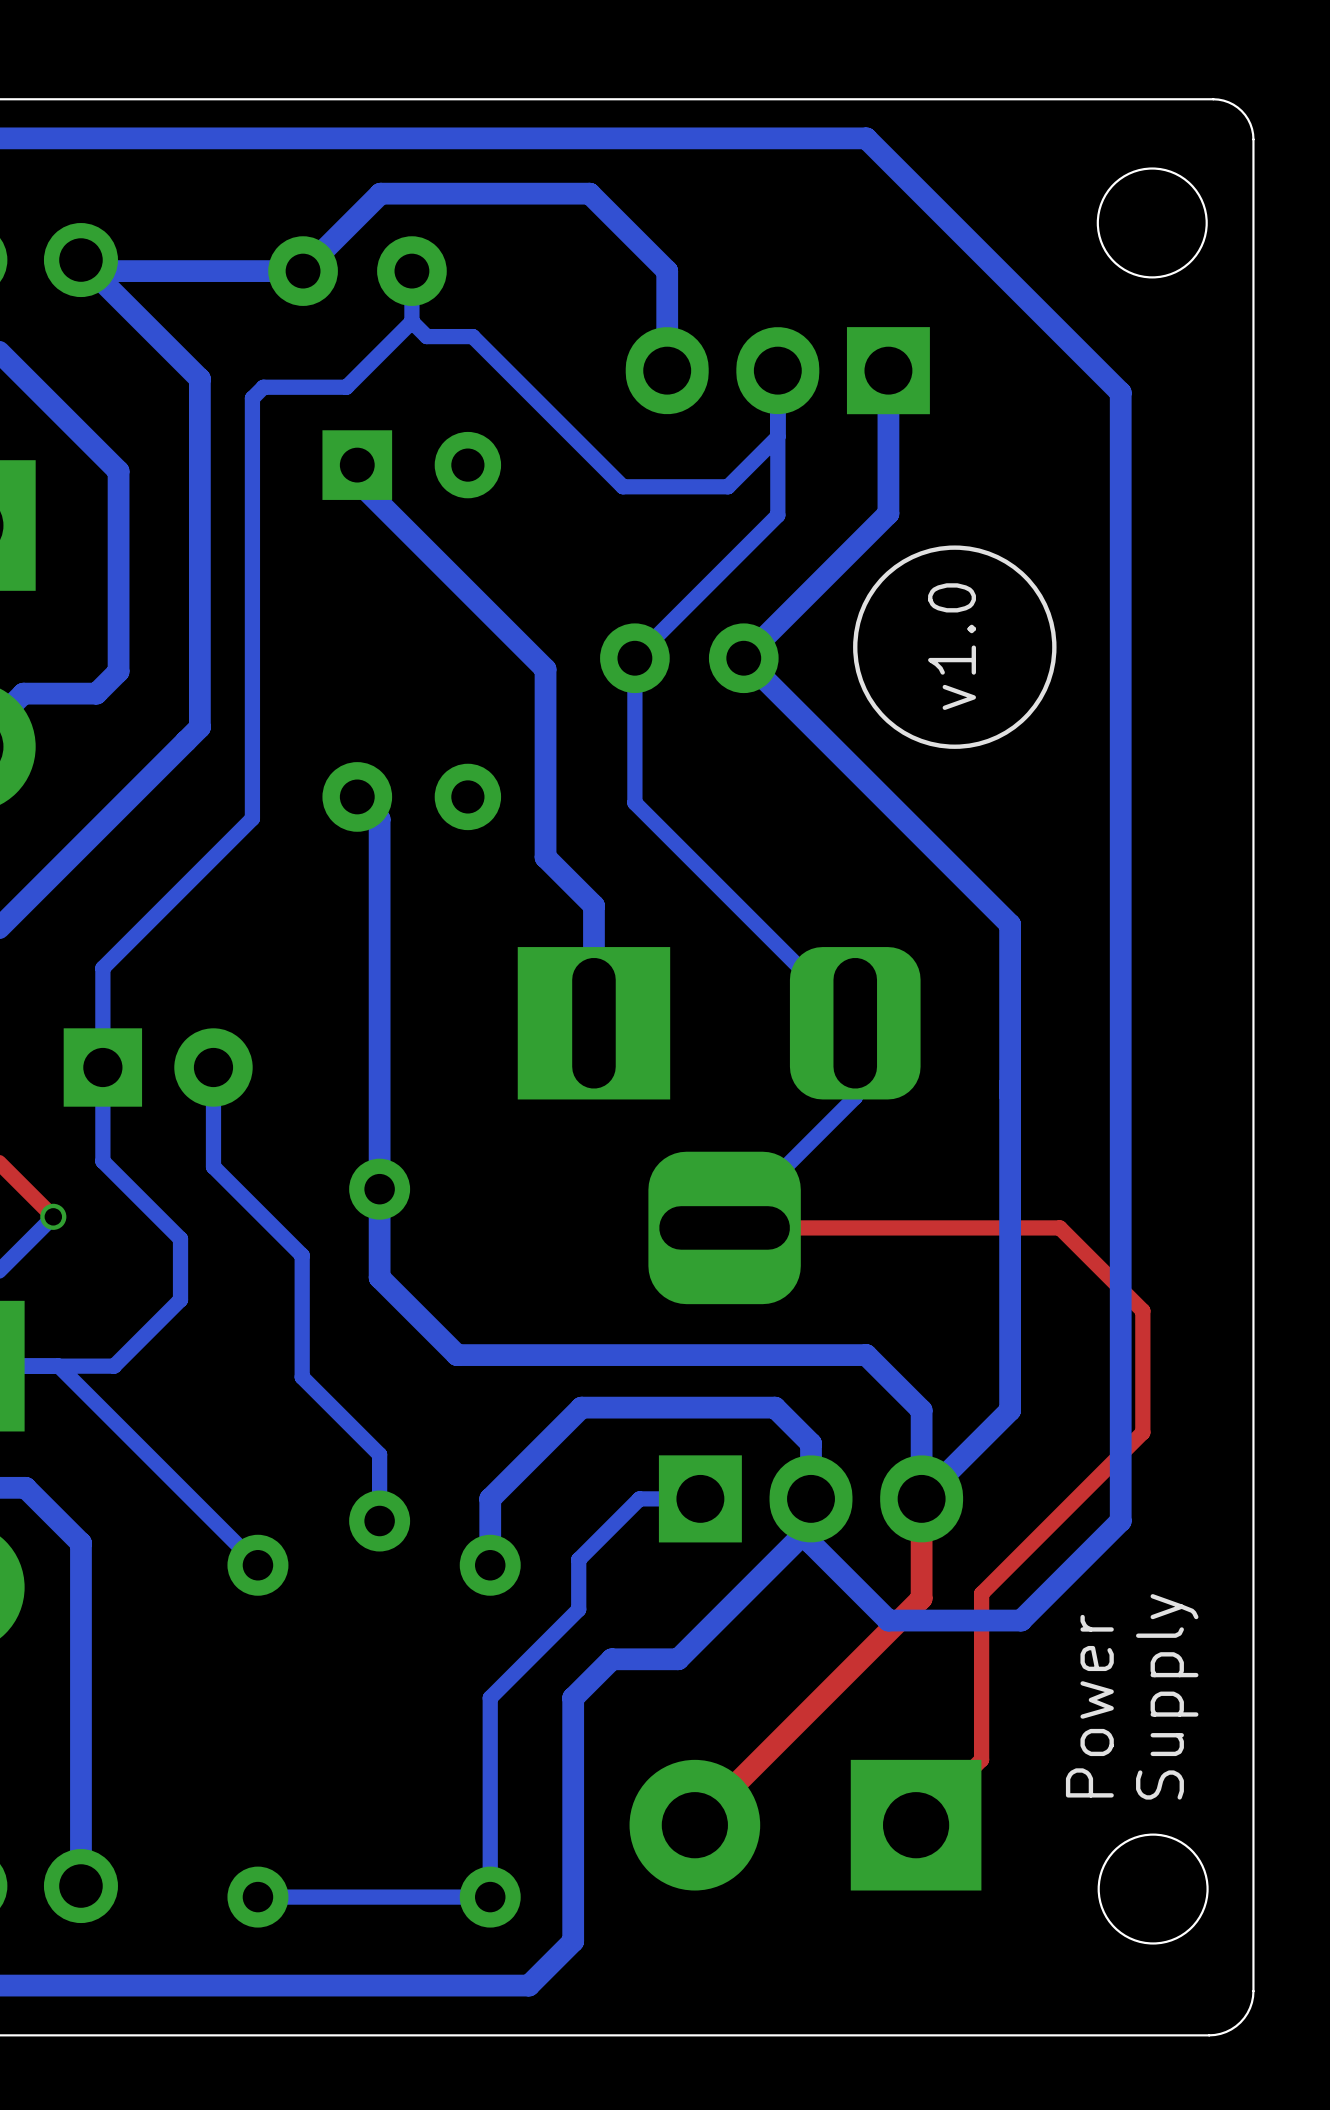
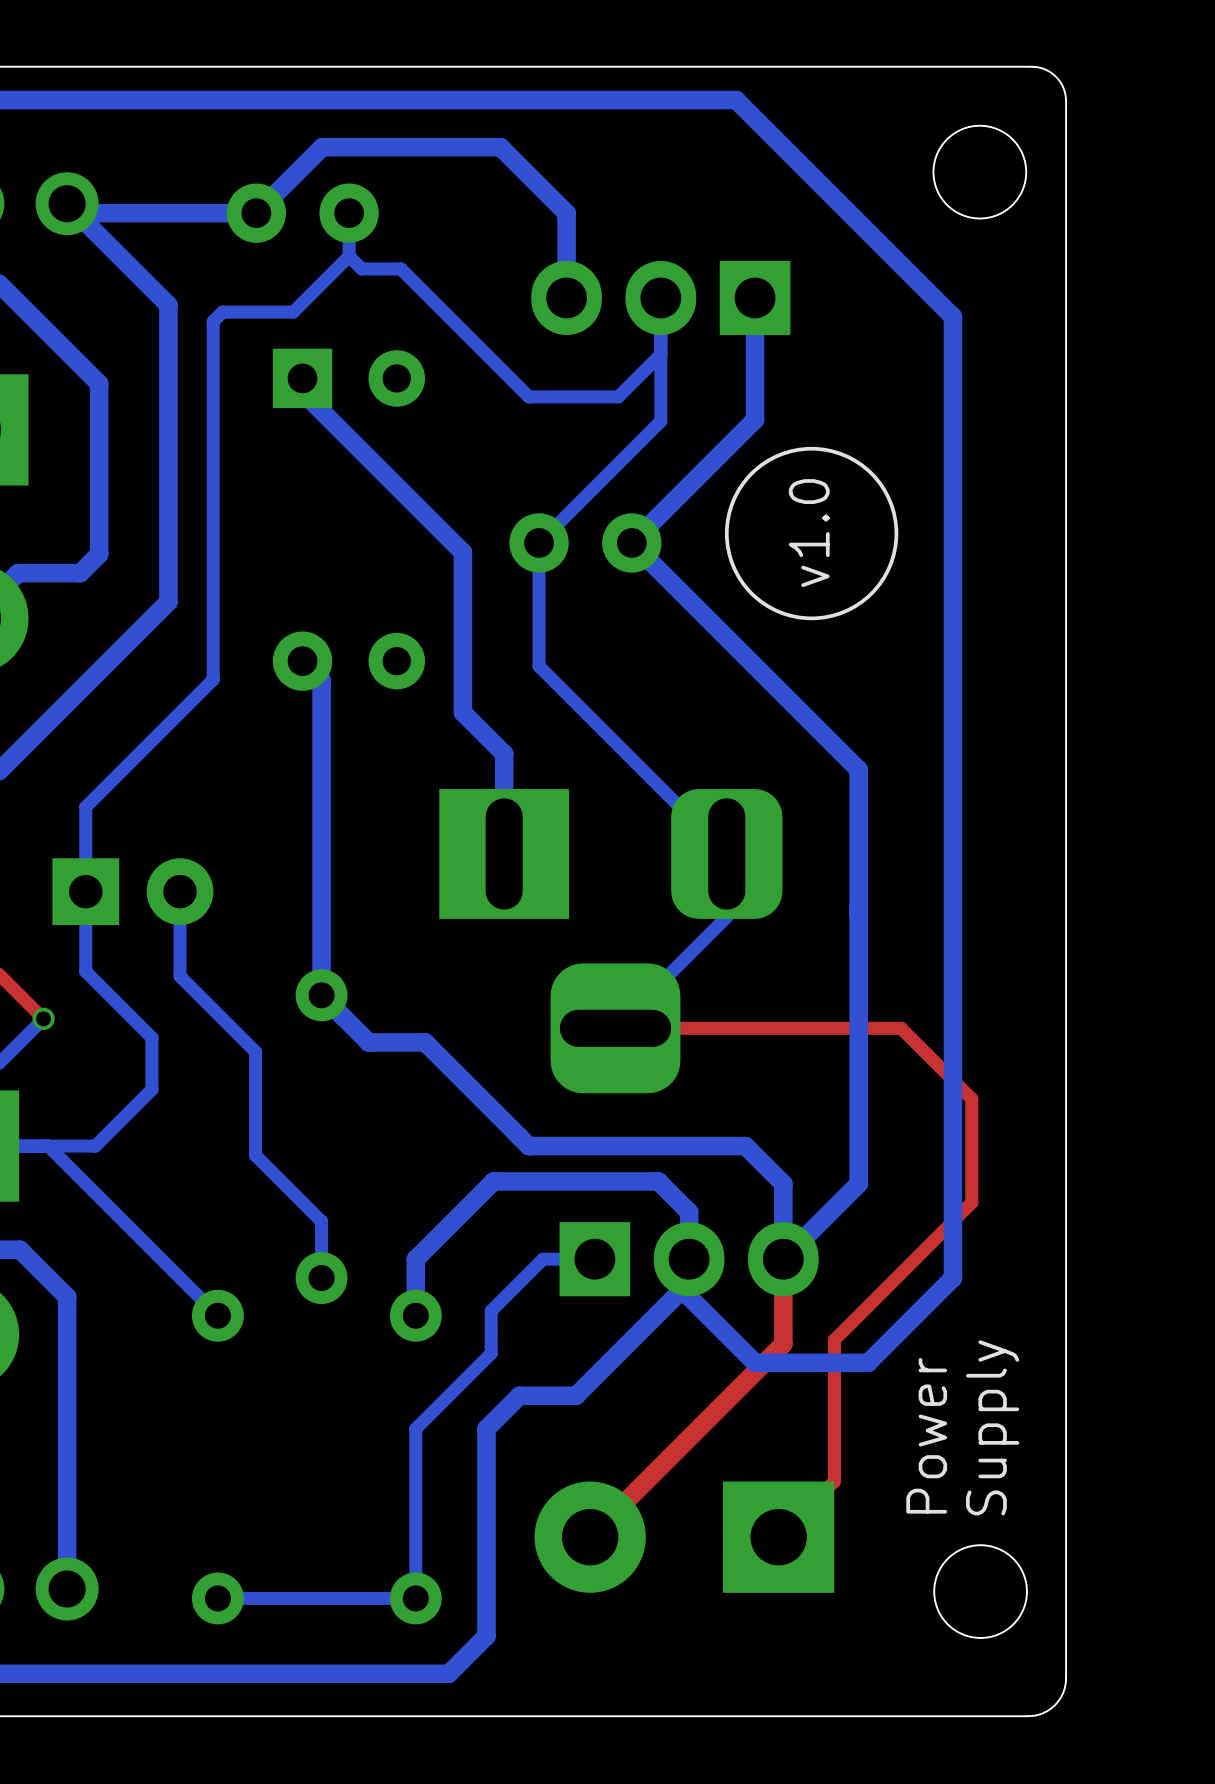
bottom track: (379, 1189) (379, 1277) (457, 1355) (866, 1355) (877, 1366) -> (321, 995) (368, 1042) (425, 1042) (528, 1146) (745, 1146)

